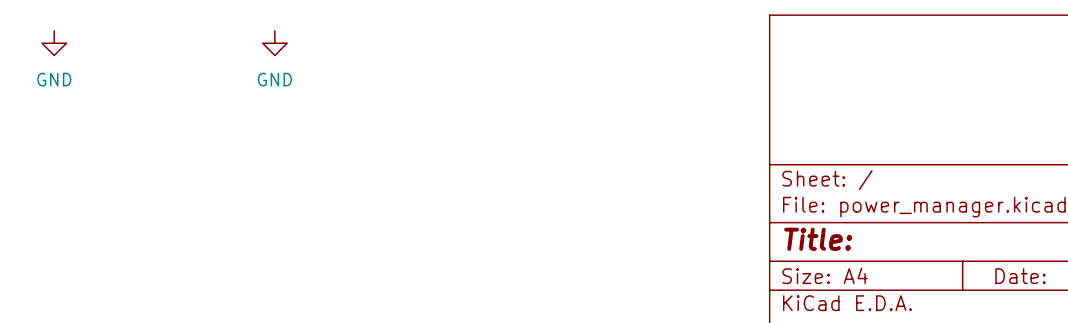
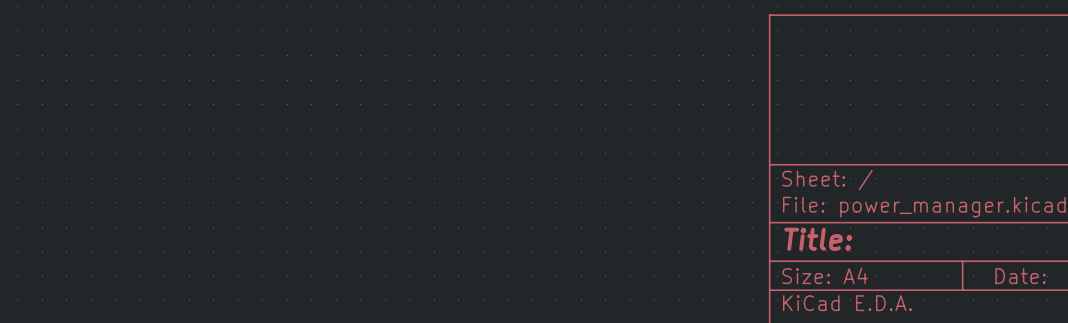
power symbol: GND (54, 43) -> none
power symbol: GND (274, 43) -> none

